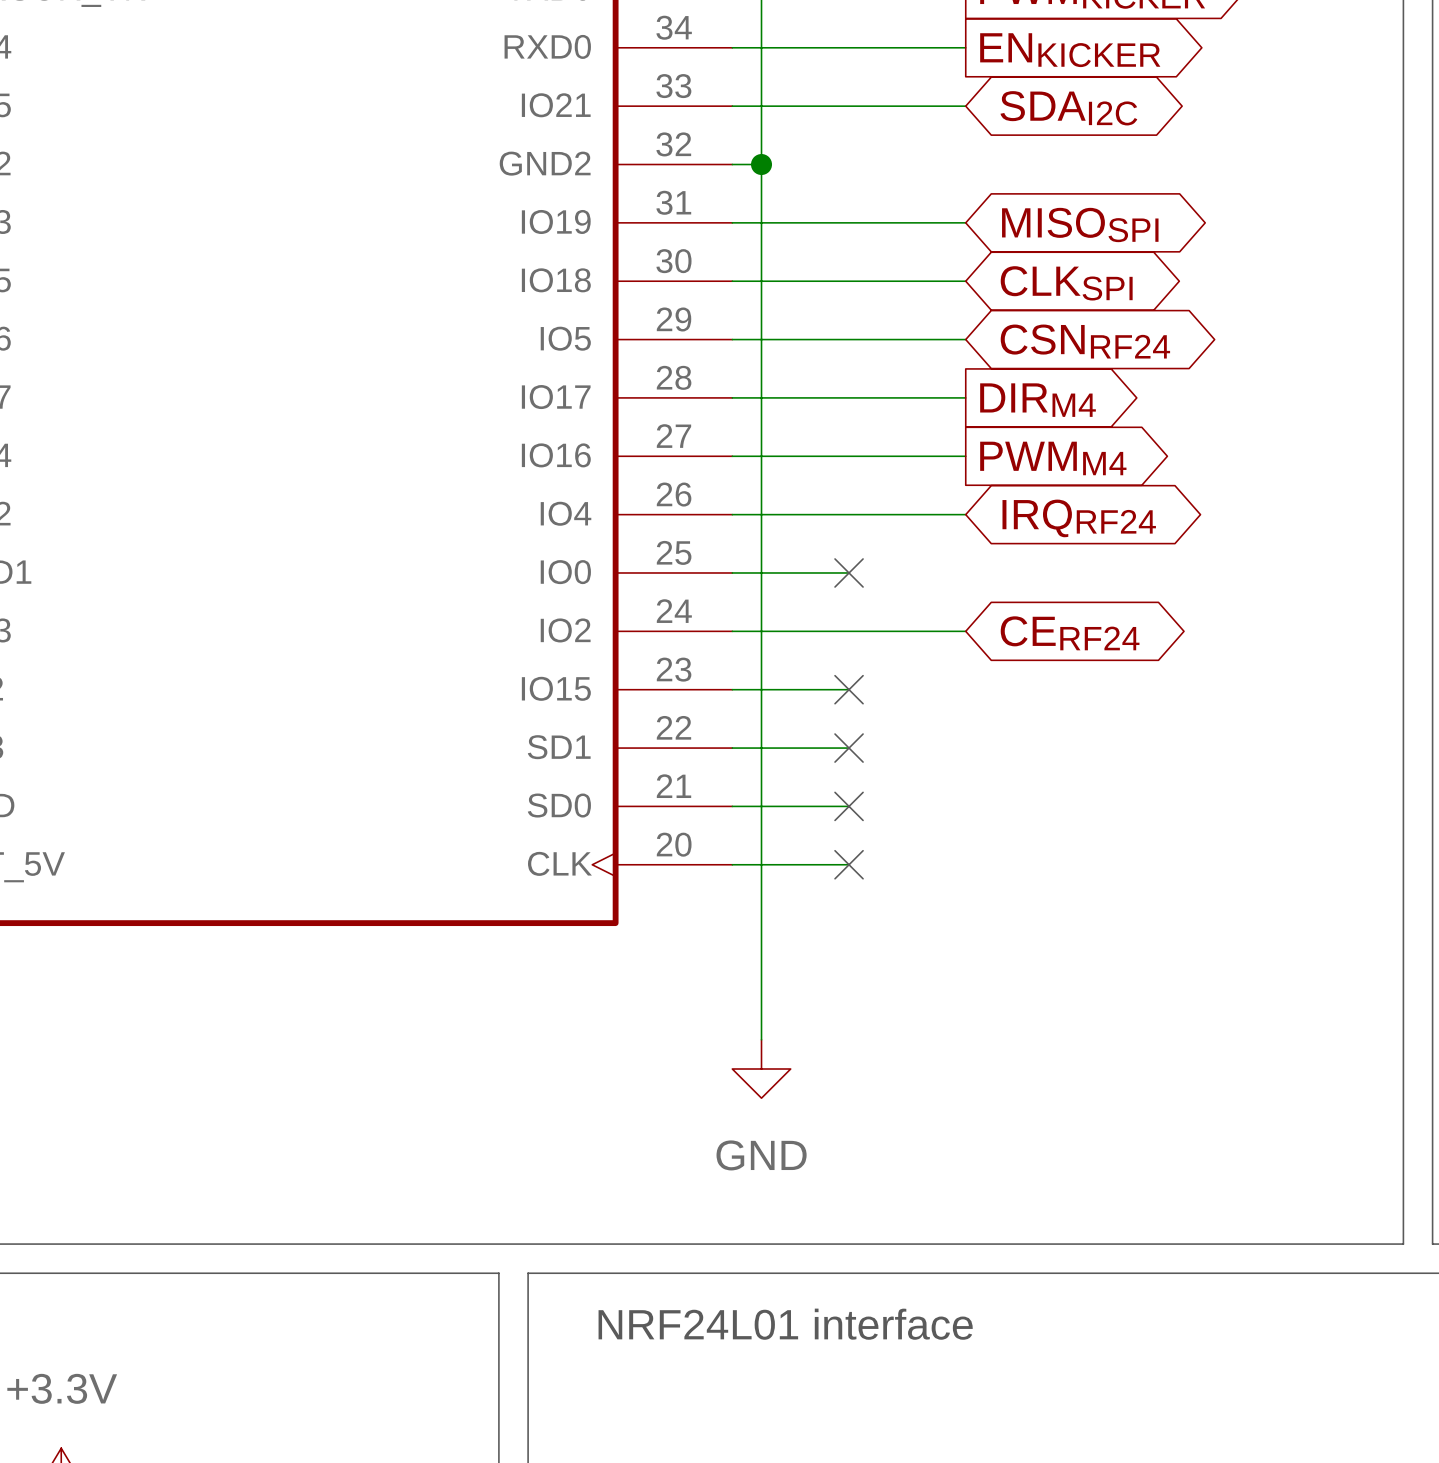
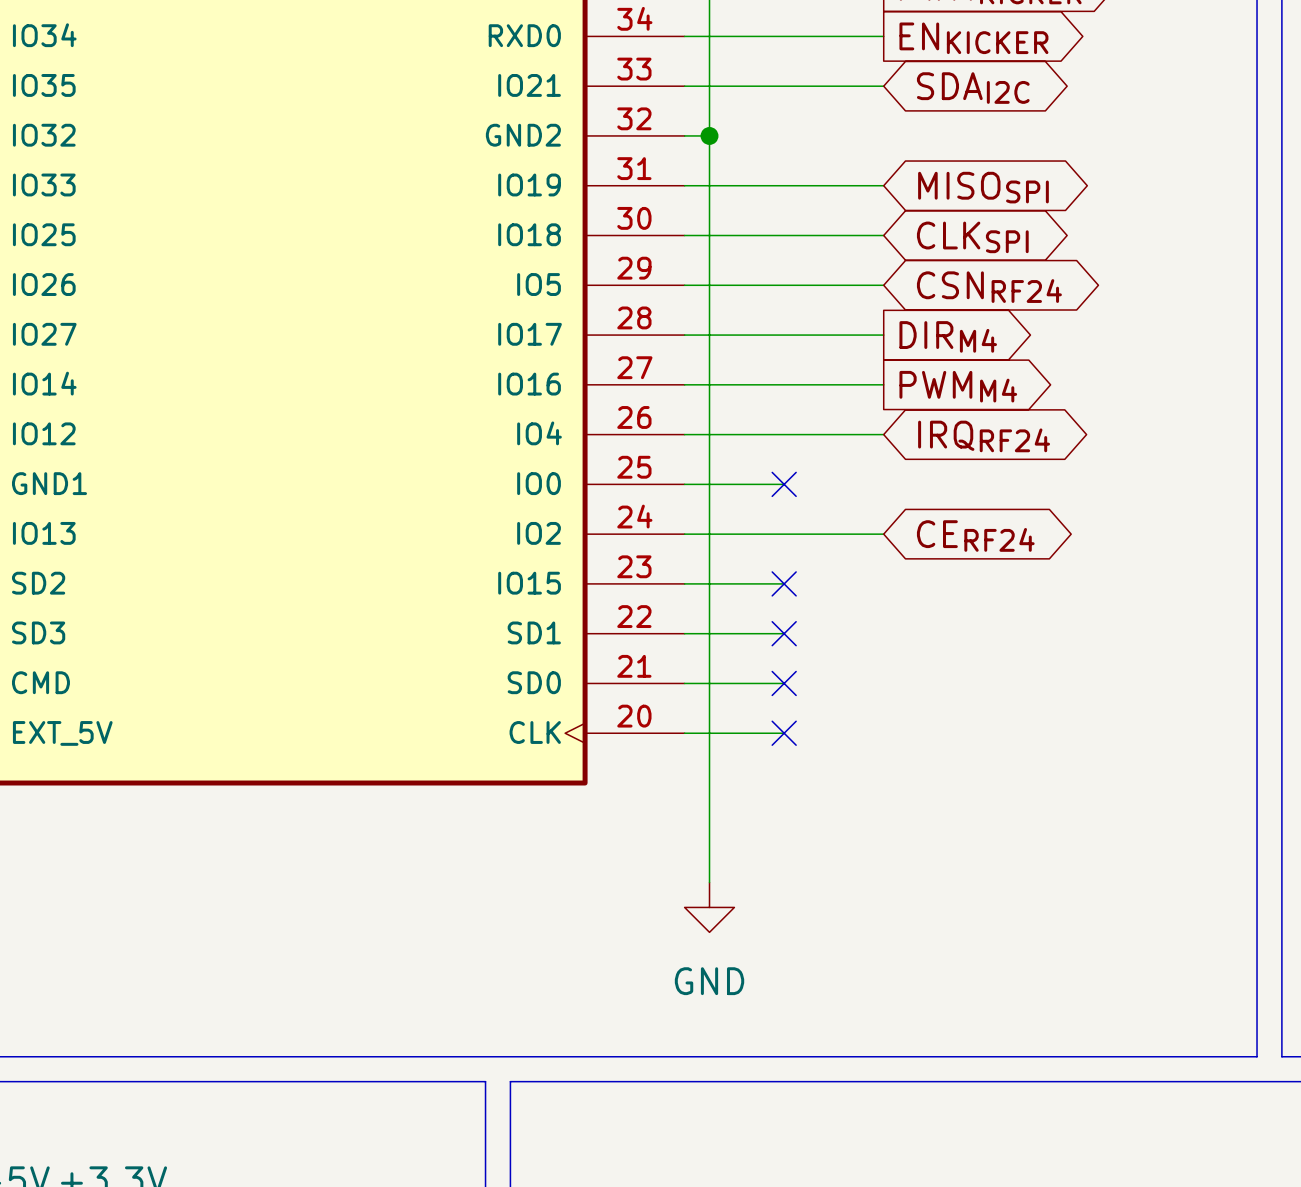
text: NRF24L01 interface (785, 1324) -> none

